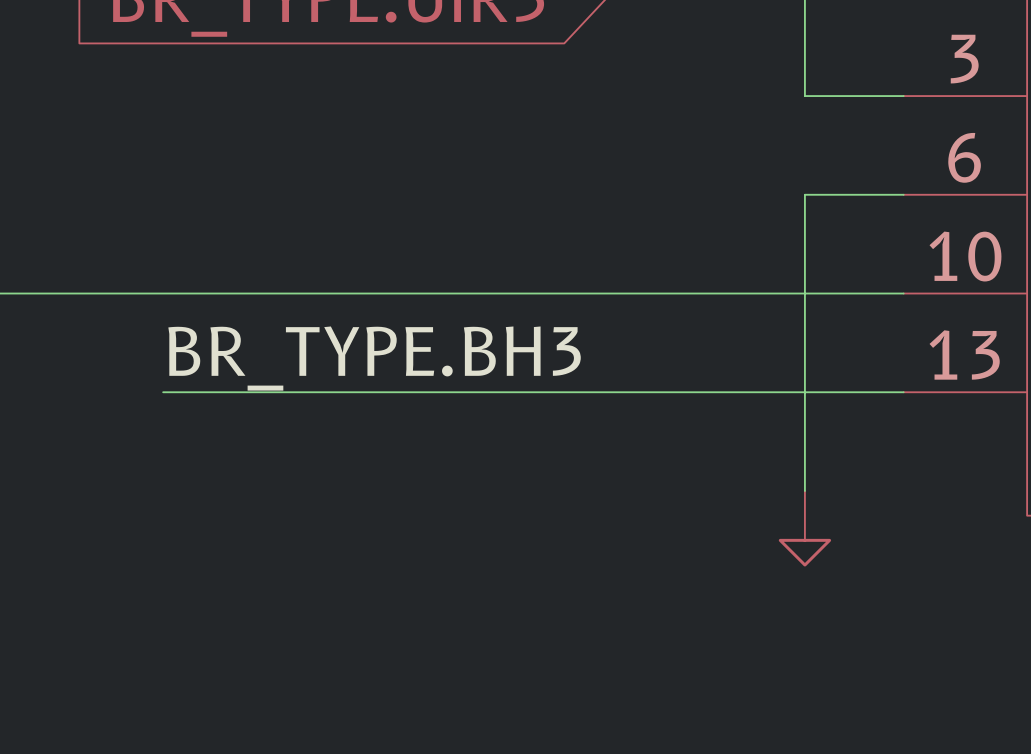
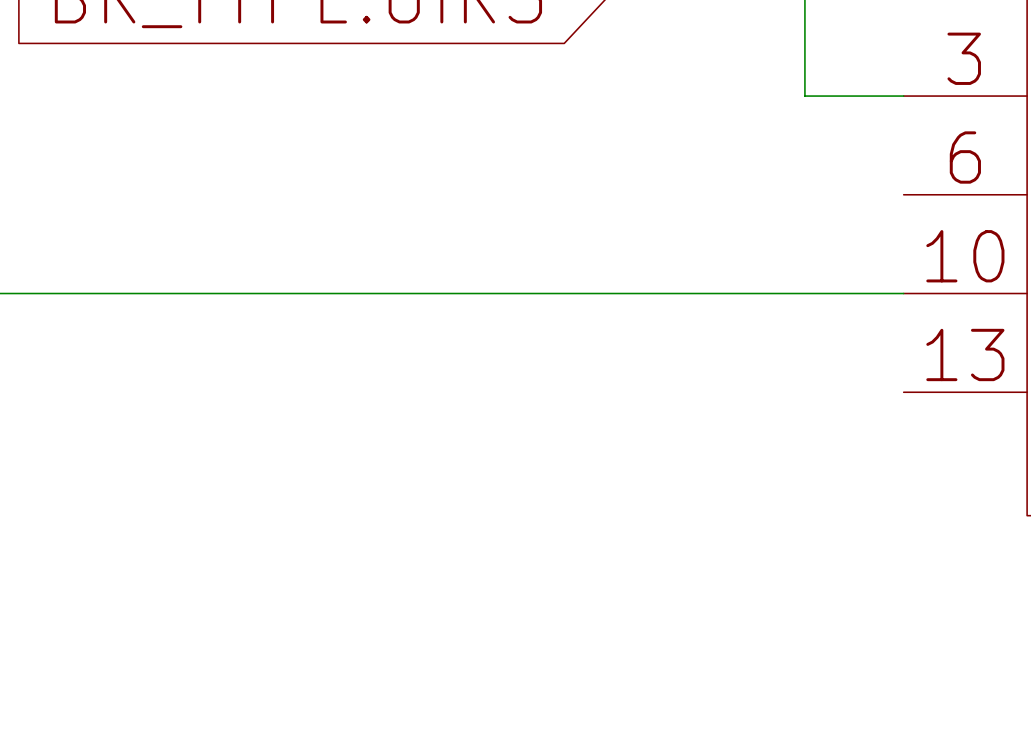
wire: (903, 194) (804, 194) (804, 490) -> none
label: BR_TYPE.BH3 (374, 358) -> none
wire: (163, 392) (903, 392) -> none
power symbol: (804, 528) -> none

